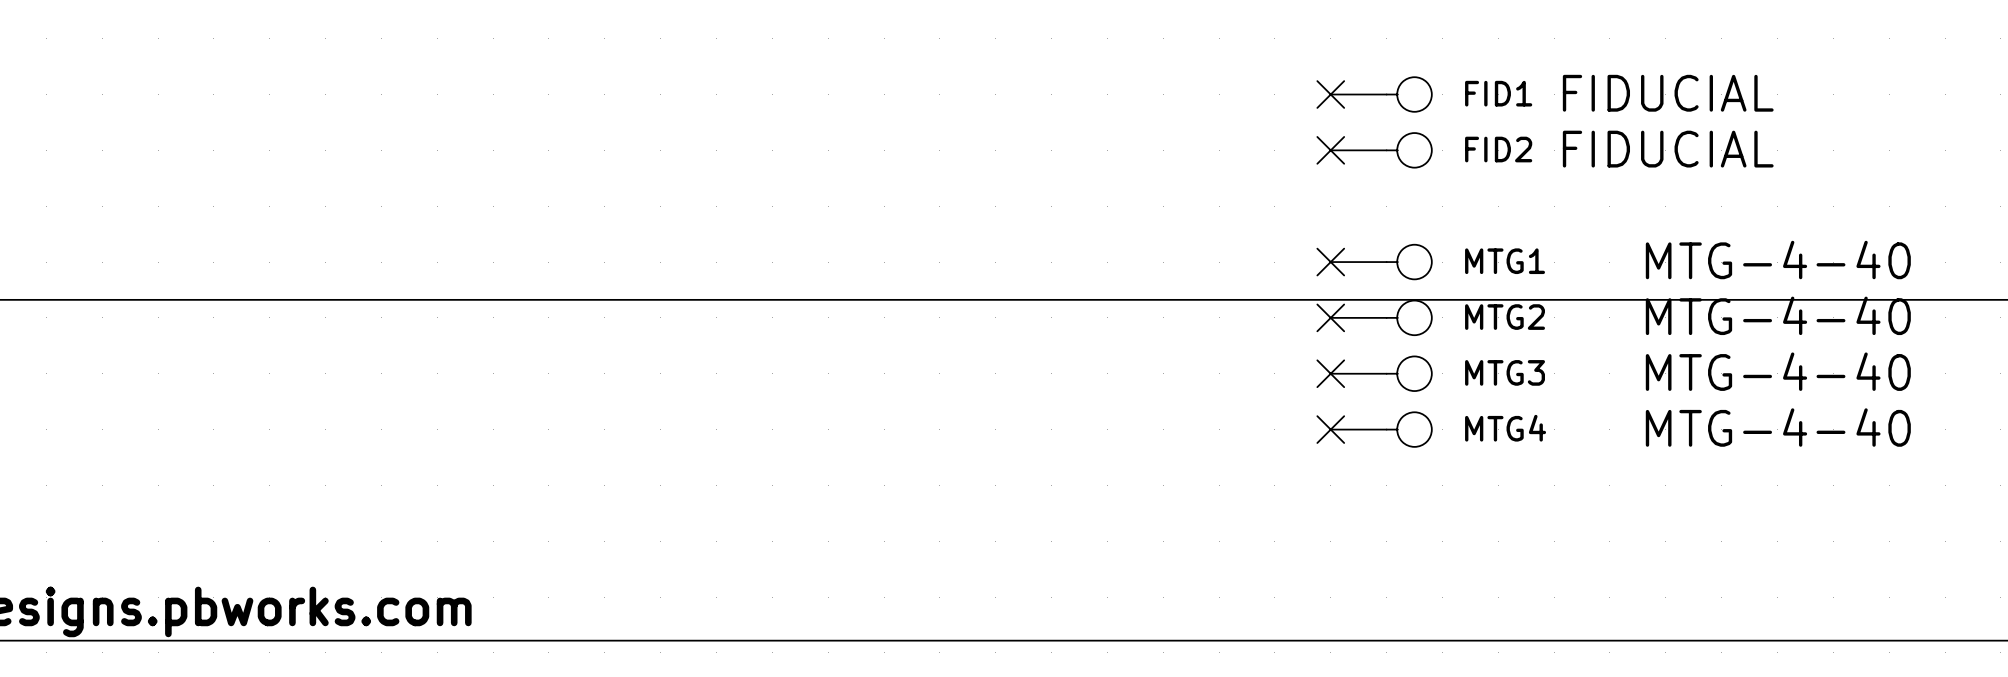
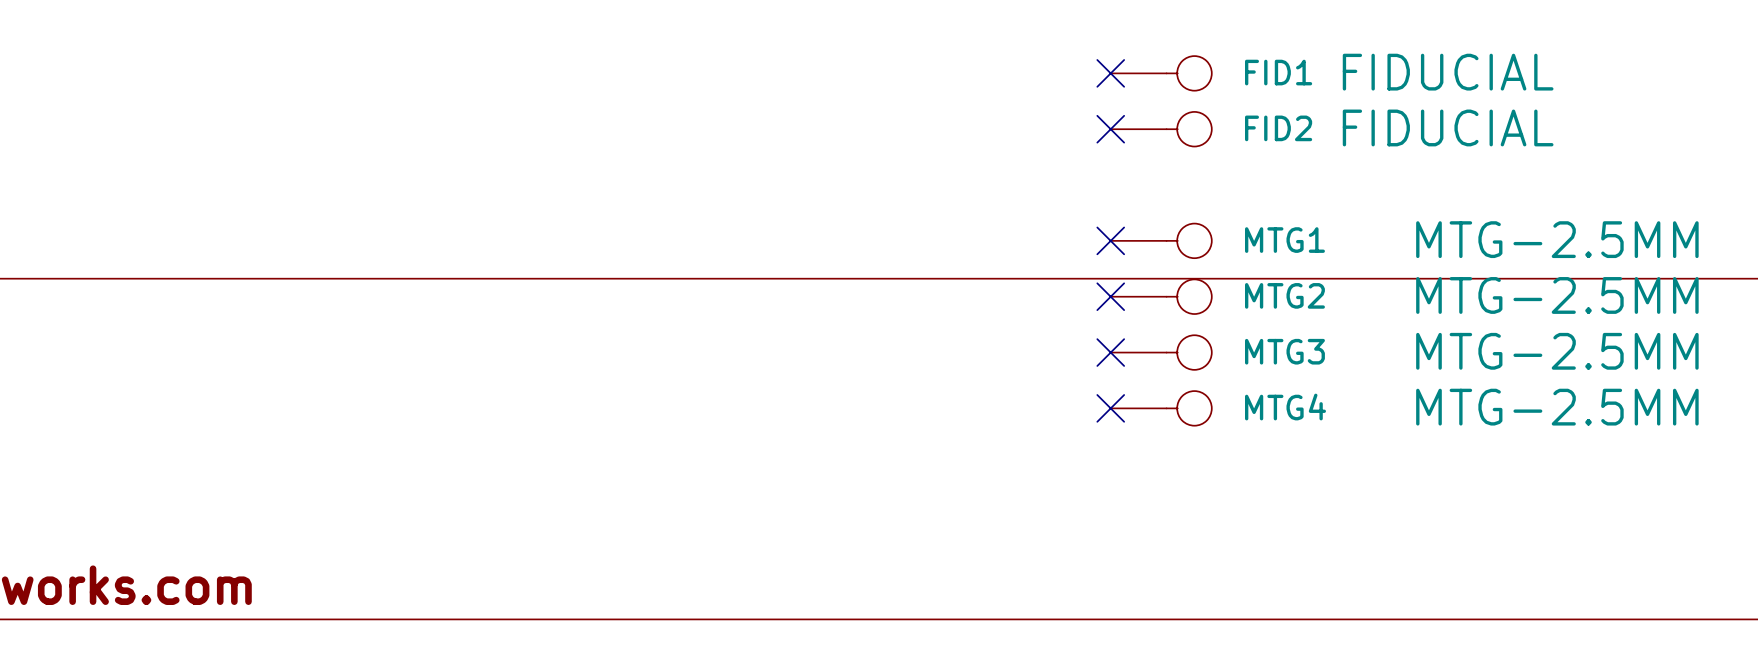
MTG1 text: MTG-4-40 (1778, 260) -> MTG-2.5MM (1557, 239)
MTG2 text: MTG-4-40 (1778, 315) -> MTG-2.5MM (1557, 295)
MTG3 text: MTG-4-40 (1778, 371) -> MTG-2.5MM (1557, 351)
MTG4 text: MTG-4-40 (1778, 427) -> MTG-2.5MM (1557, 407)

